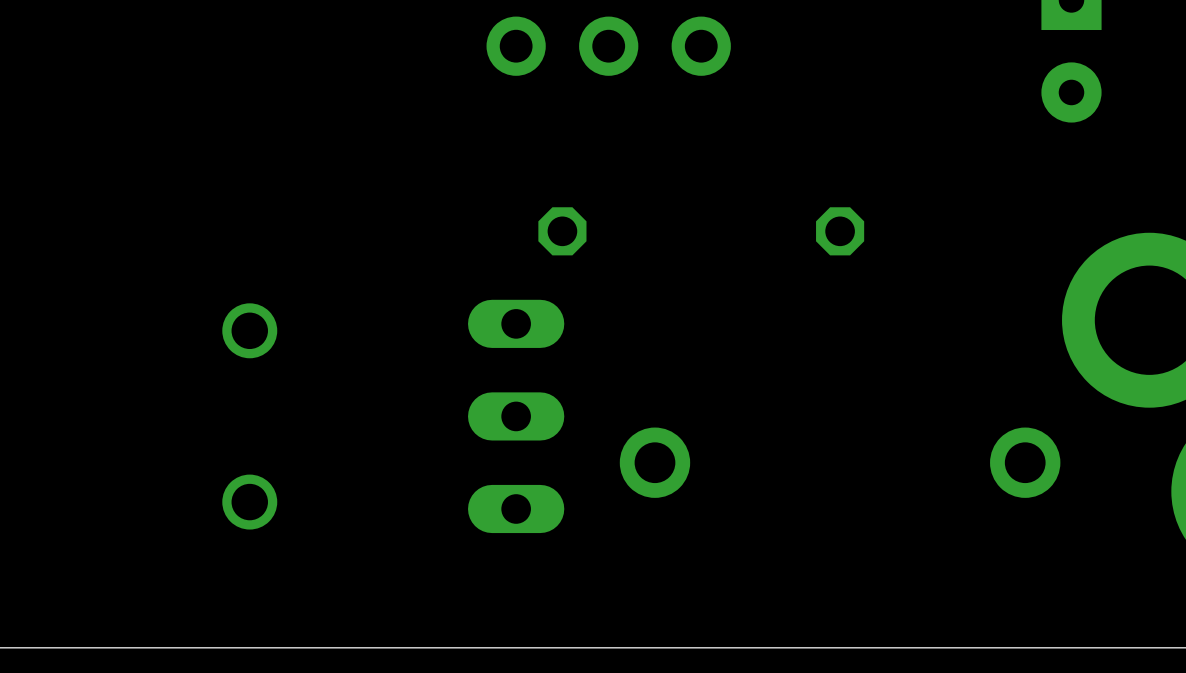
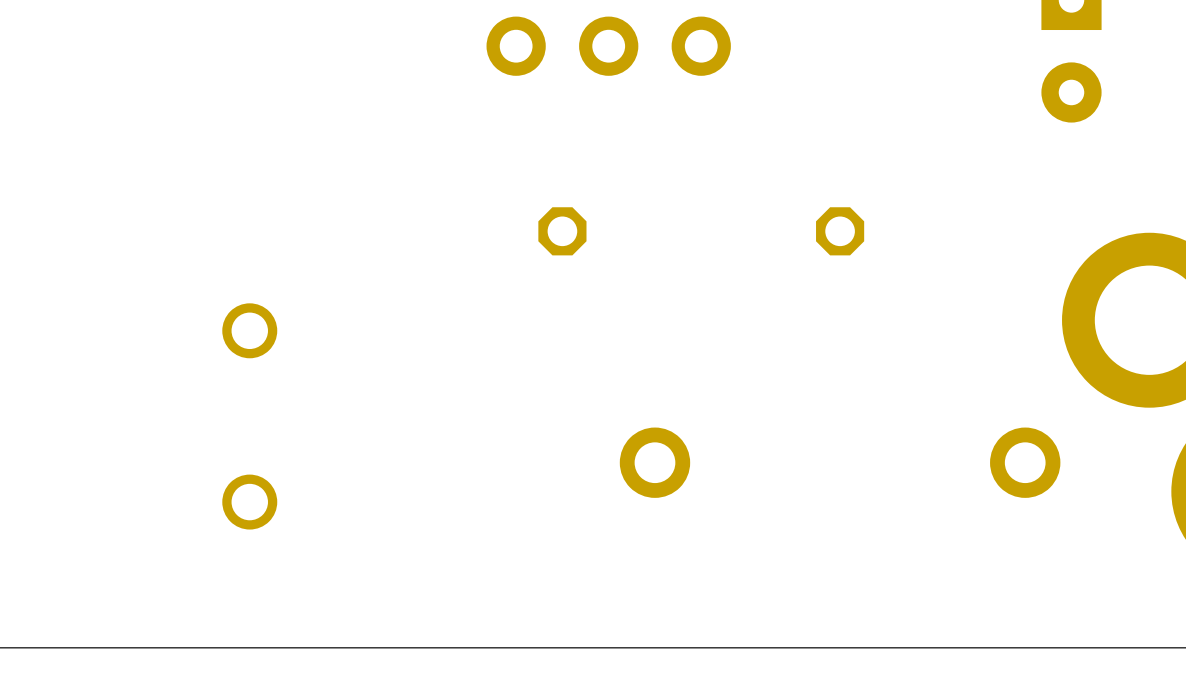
part: (516, 416) -> none

